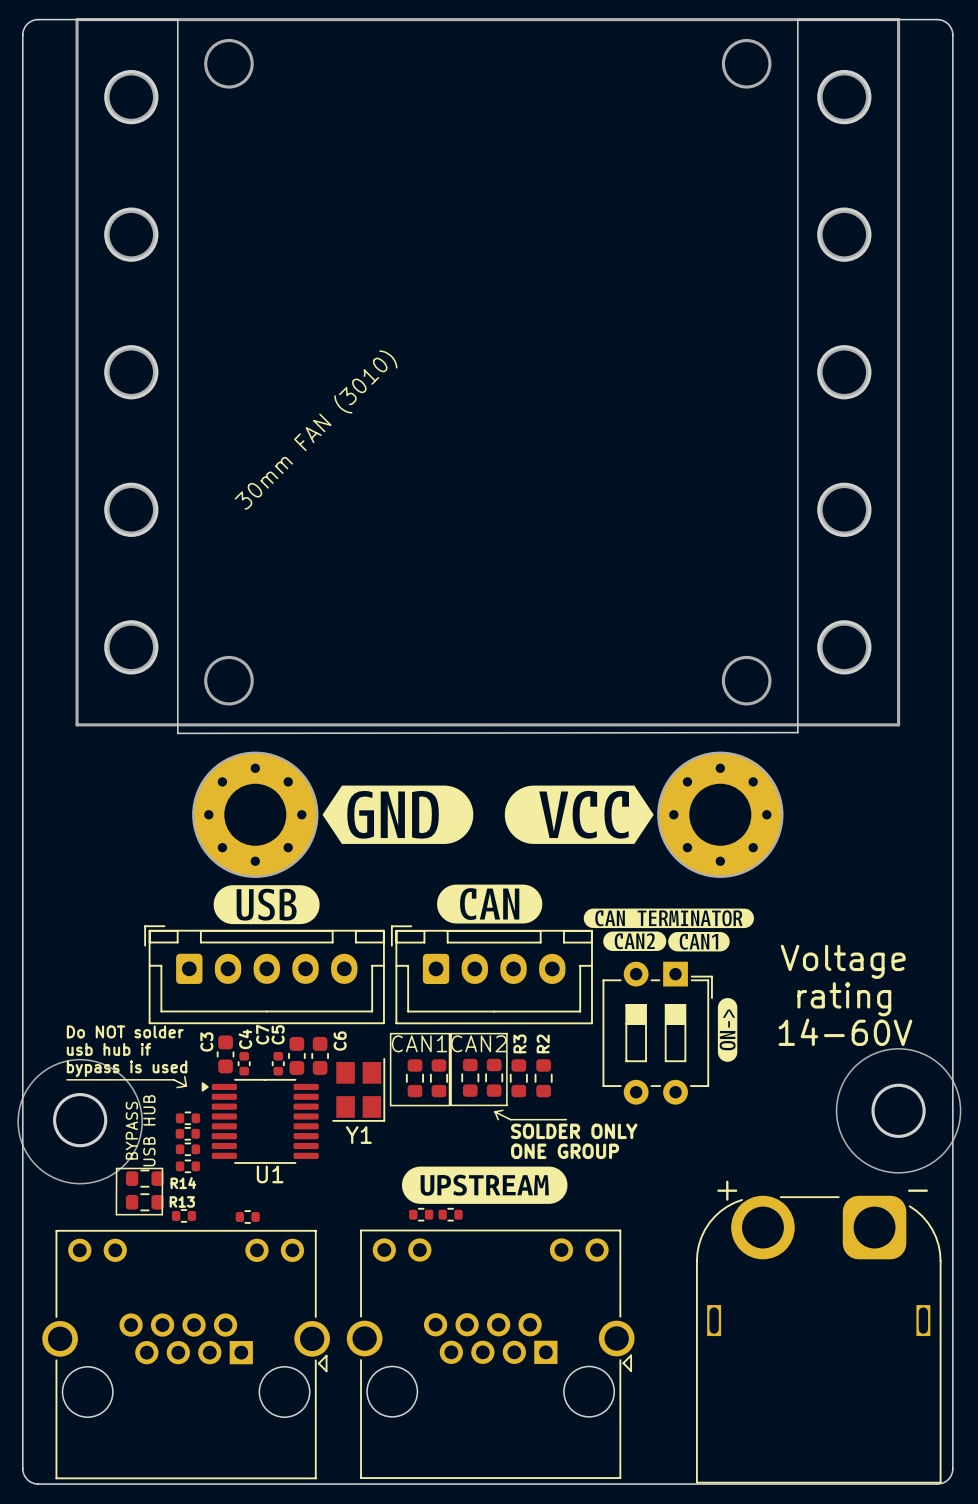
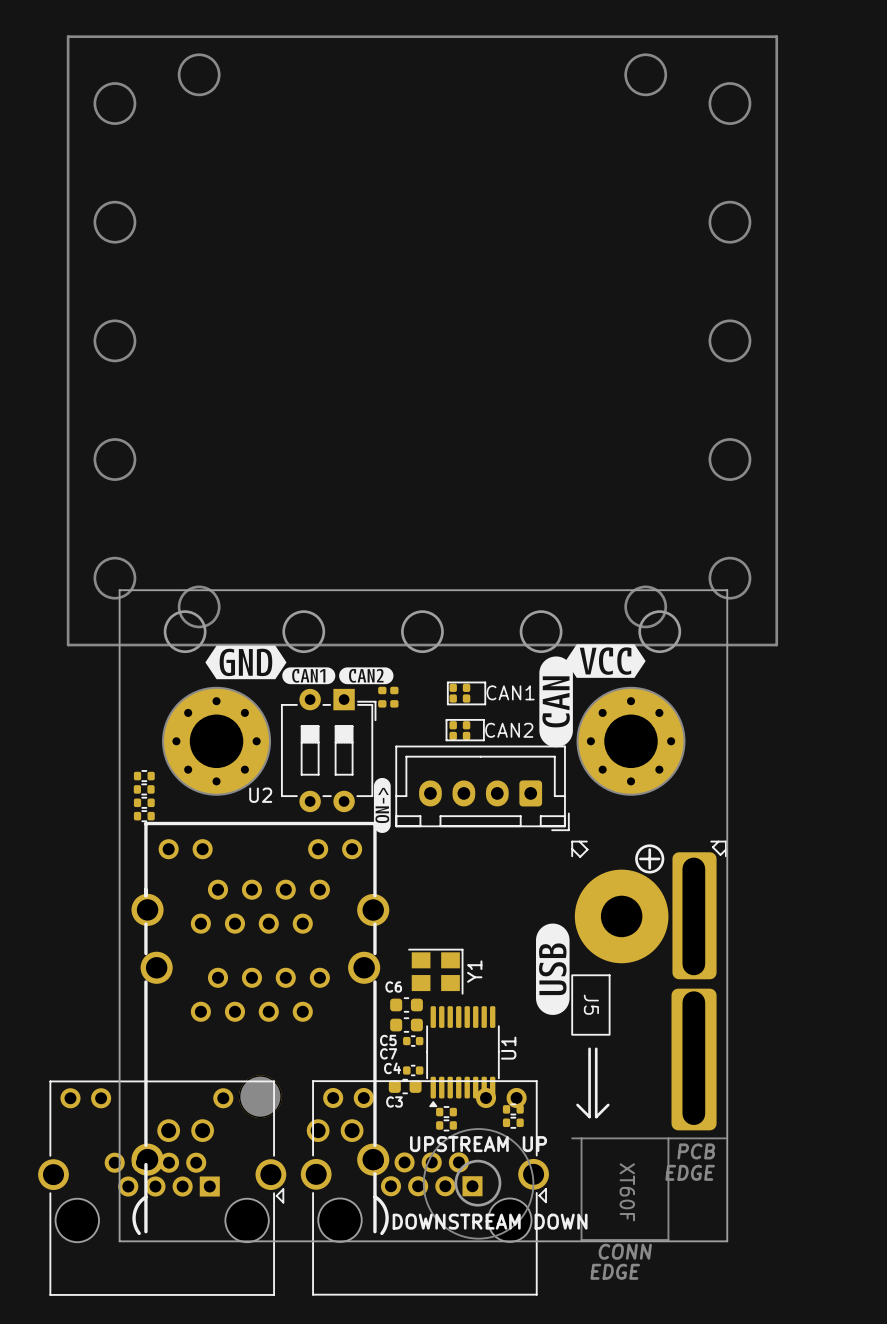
board edge: (38, 19) (177, 19) (177, 733) (797, 732) (797, 19) (937, 19) (945, 21) (950, 26) (952, 35) (952, 1468) (951, 1475) (945, 1481) (937, 1484) (38, 1484) (30, 1481) (25, 1476) (22, 1468) (22, 35) (27, 24) (38, 19) -> none
round board edge: [104, 69, 159, 125] -> none
round board edge: [817, 69, 872, 125] -> none
round board edge: [104, 207, 159, 262] -> none
round board edge: [817, 207, 872, 262] -> none
round board edge: [104, 345, 159, 400] -> none
round board edge: [817, 345, 872, 400] -> none
text: 30mm FAN (3010) (316, 429) -> none
round board edge: [104, 482, 159, 537] -> none
round board edge: [817, 482, 872, 537] -> none
round board edge: [104, 620, 159, 675] -> none
round board edge: [817, 620, 872, 675] -> none
board edge: none -> (119, 590) (727, 590) (727, 1241) (119, 1241) (119, 590)
round board edge: none -> [163, 610, 207, 654]
round board edge: none -> [282, 610, 326, 654]
round board edge: none -> [401, 610, 444, 654]
round board edge: none -> [519, 610, 563, 654]
round board edge: none -> [638, 610, 682, 654]
drawing: none -> [539, 644, 646, 748]
drawing: none -> [205, 645, 336, 685]
line: none -> (447, 682) (485, 682) (485, 704) (447, 704) (447, 682)
part: none -> (459, 687)
drawing: [322, 785, 474, 844] -> none
part: none -> (382, 697)
part: none -> (394, 697)
drawing: [504, 785, 654, 844] -> none
part: none -> (459, 698)
line: none -> (446, 719) (483, 719) (483, 740) (446, 740) (446, 719)
part position: (255, 814) -> (216, 741)
part position: (720, 814) -> (631, 741)
part: none -> (459, 725)
part: none -> (459, 735)
part: none -> (144, 776)
drawing: [437, 884, 543, 924] -> none
drawing: [213, 885, 320, 925] -> none
part: none -> (144, 789)
part: none -> (144, 802)
drawing: [583, 908, 754, 952] -> none
part: none -> (144, 816)
drawing position: (634, 941) -> (366, 675)
text: Voltage (843, 961) -> none
part: (264, 974) -> none
part rotation: 0° (491, 974) -> 180° (482, 788)
text: rating (844, 999) -> none
drawing position: (727, 1029) -> (382, 805)
text: Do NOT solder (125, 1031) -> none
text: 14-60V (845, 1032) -> none
line: (390, 1033) (449, 1033) (449, 1105) (390, 1105) (390, 1033) -> none
line: (451, 1033) (506, 1033) (506, 1105) (451, 1105) (451, 1033) -> none
part position: (657, 1033) -> (328, 750)
C7 name position: C7 (262, 1034) -> C7 (388, 1053)
C5 name position: C5 (278, 1034) -> C5 (388, 1040)
C4 name position: C4 (245, 1039) -> C4 (392, 1068)
C6 name position: C6 (340, 1041) -> C6 (393, 987)
C3 name position: C3 (206, 1042) -> C3 (394, 1101)
text position: CAN1 (419, 1043) -> CAN1 (510, 692)
text position: CAN2 (478, 1043) -> CAN2 (509, 730)
drawing: none -> [536, 923, 570, 1015]
drawing: [835, 1048, 962, 1174] -> none
text: usb hub if (108, 1049) -> none
C3 rotation: 0° (225, 1054) -> 90° clockwise (405, 1086)
C3 position: (225, 1054) -> (405, 1086)
C5 rotation: 0° (296, 1055) -> 90° clockwise (406, 1025)
C5 position: (296, 1055) -> (406, 1025)
C6 rotation: 0° (320, 1055) -> 90° clockwise (406, 1004)
C6 position: (320, 1055) -> (406, 1004)
drawing: [17, 1058, 143, 1185] -> none
C4 rotation: 0° (244, 1063) -> 90° clockwise (413, 1070)
C4 position: (244, 1063) -> (413, 1070)
C7 rotation: 0° (278, 1063) -> 90° clockwise (413, 1041)
C7 position: (278, 1063) -> (413, 1041)
text: bypass is used (127, 1068) -> none
line: (184, 1076) (186, 1086) -> none
part: (470, 1077) -> none
part: (494, 1077) -> none
part: (414, 1078) -> none
part: (438, 1078) -> none
R3: (518, 1078) -> none
R2: (543, 1078) -> none
line: (66, 1079) (173, 1079) (186, 1086) -> none
round board edge: [871, 1083, 926, 1138] -> none
line: (186, 1086) (177, 1087) -> none
Y1 rotation: 0° (358, 1089) -> 90° counterclockwise (435, 971)
Y1 position: (358, 1089) -> (435, 971)
round board edge: [53, 1093, 108, 1148] -> none
line: (502, 1110) (495, 1111) -> none
line: (495, 1111) (498, 1119) -> none
line: (495, 1111) (510, 1119) (566, 1119) -> none
part: (187, 1118) -> none
U1 rotation: 0° (260, 1121) -> 90° counterclockwise (462, 1056)
U1 position: (260, 1121) -> (462, 1056)
text: BYPASS (131, 1130) -> none
text: USB HUB (149, 1130) -> none
text: SOLDER ONLY (574, 1131) -> none
part: (187, 1133) -> none
part: (187, 1149) -> none
text: ONE GROUP (565, 1151) -> none
part: (187, 1166) -> none
drawing: [401, 1166, 568, 1204] -> none
line: (116, 1168) (162, 1168) (162, 1214) (116, 1214) (116, 1168) -> none
U2: none -> (260, 1028)
R14: (144, 1178) -> none
J5: none -> (649, 1040)
R13: (144, 1202) -> none
part: (421, 1214) -> none
part: (450, 1214) -> none
part: (184, 1215) -> none
part: (247, 1217) -> none
part: none -> (513, 1109)
part: none -> (446, 1112)
part: none -> (513, 1122)
part: none -> (446, 1125)
drawing: none -> [423, 1128, 535, 1240]
text: none -> UPSTREAM UP (478, 1144)
round board edge: none -> [454, 1159, 502, 1207]
part: (818, 1339) -> none
text: none -> DOWNSTREAM DOWN (490, 1221)

